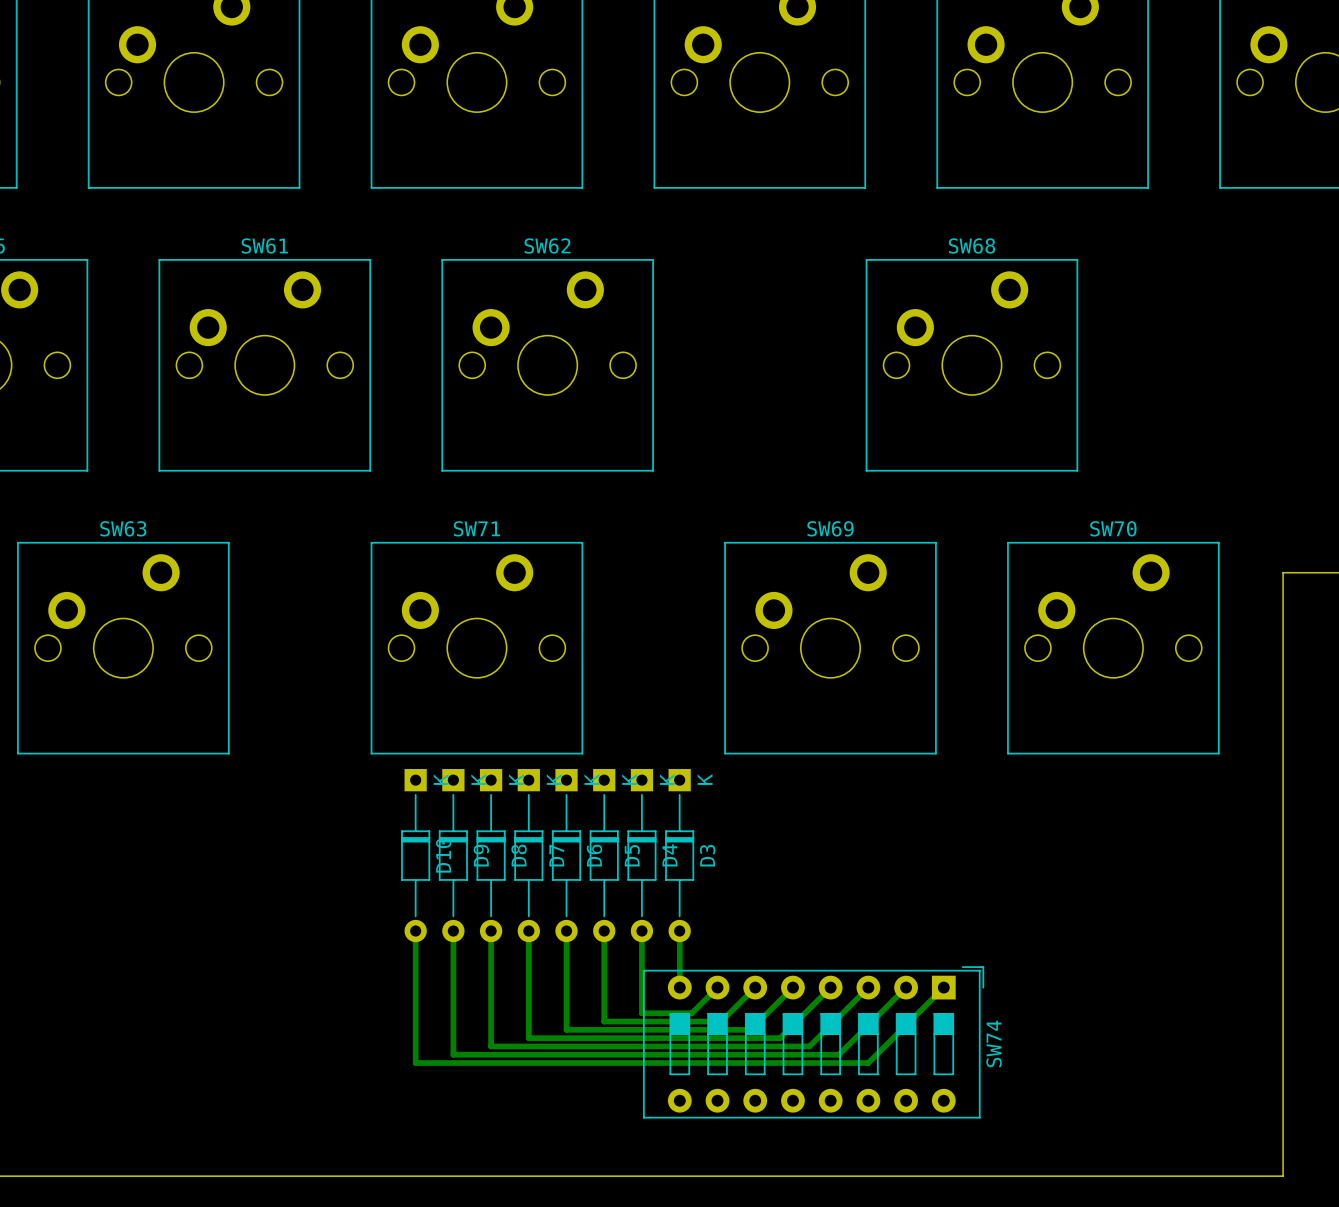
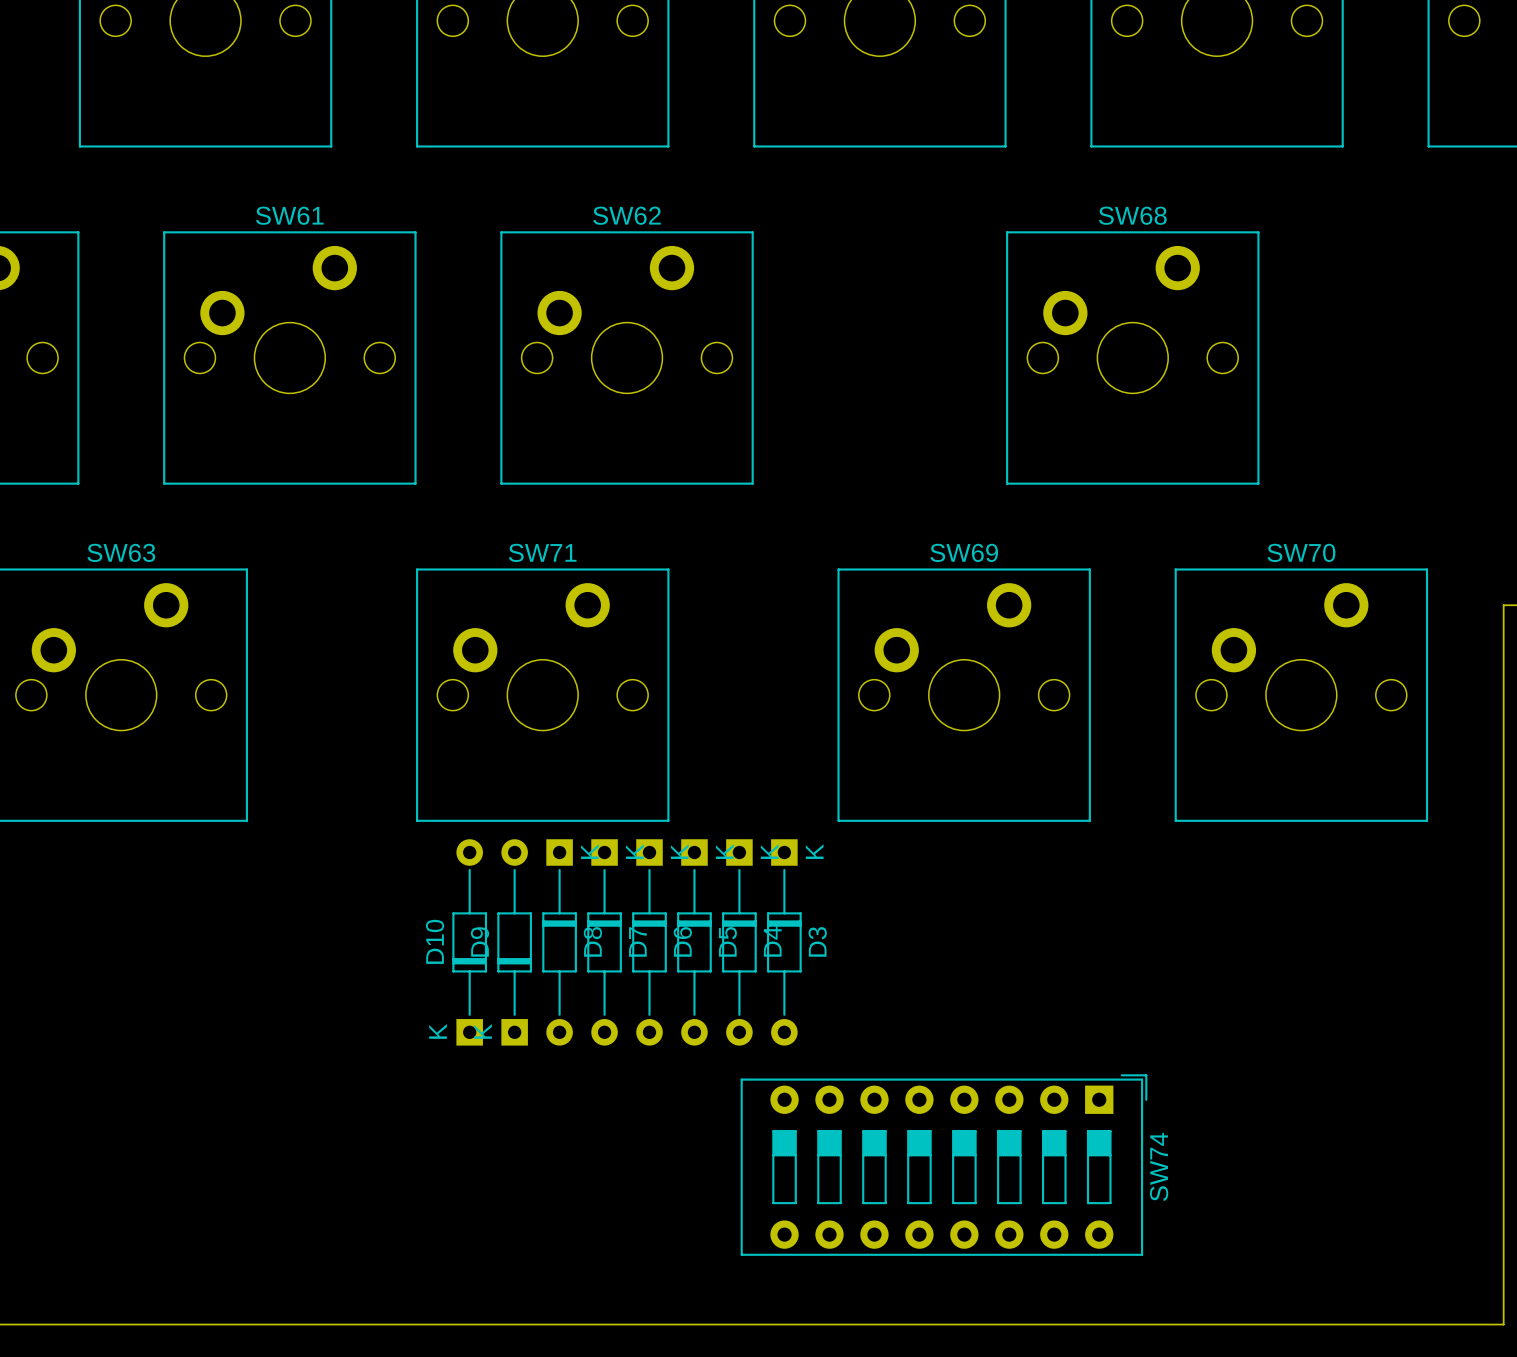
D10 rotation: 0° (415, 855) -> 180° (469, 942)
D9 rotation: 0° (453, 855) -> 180° (514, 942)
bottom track: (415, 931) (415, 1063) (868, 1063) (943, 987) -> none
bottom track: (453, 931) (453, 1054) (838, 1054) (906, 987) -> none
bottom track: (491, 931) (491, 1046) (809, 1046) (868, 987) -> none
bottom track: (528, 931) (528, 1038) (780, 1038) (830, 987) -> none
bottom track: (566, 931) (566, 1029) (750, 1029) (792, 987) -> none
bottom track: (604, 931) (604, 1021) (721, 1021) (755, 987) -> none
bottom track: (641, 931) (641, 1013) (691, 1013) (717, 987) -> none
bottom track: (679, 931) (679, 987) -> none

